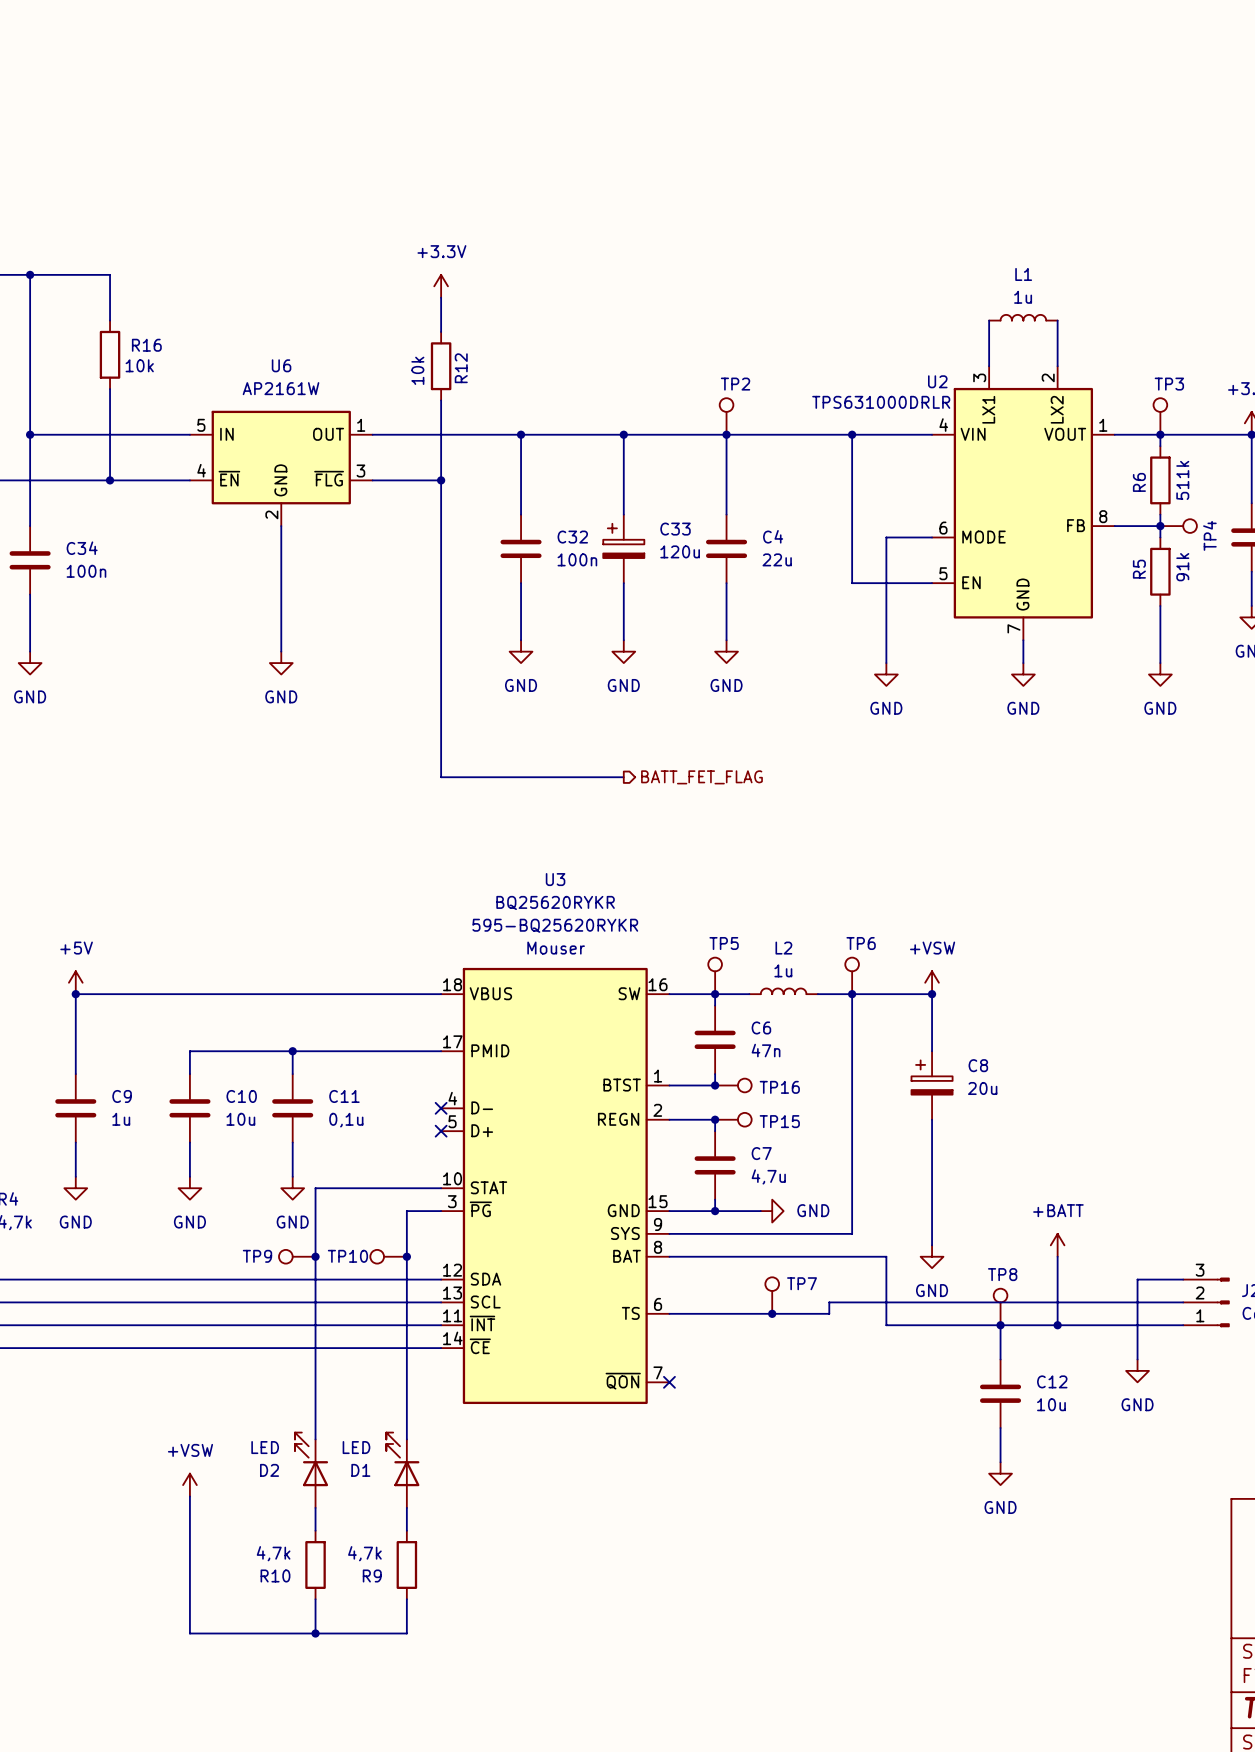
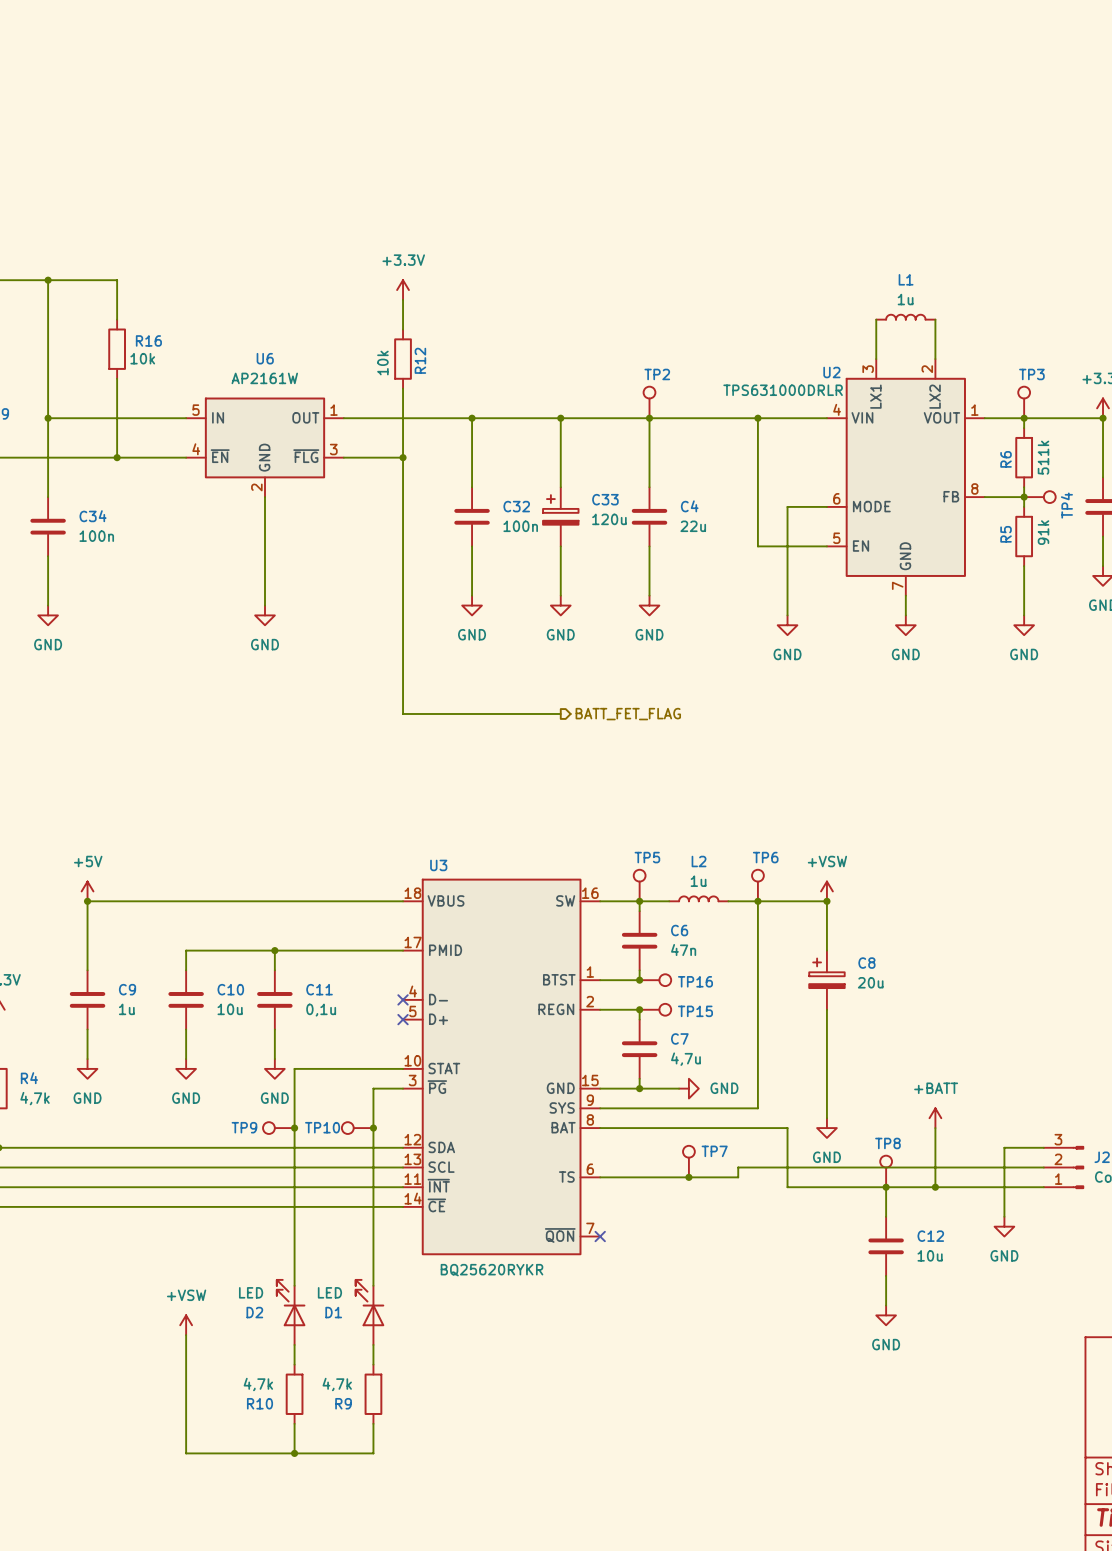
U3 name position: U3 (555, 879) -> U3 (438, 865)
U3 value position: BQ25620RYKR (555, 902) -> BQ25620RYKR (491, 1270)
U3 text: 595-BQ25620RYKR (555, 925) -> none
U3 text: Mouser (556, 948) -> none

